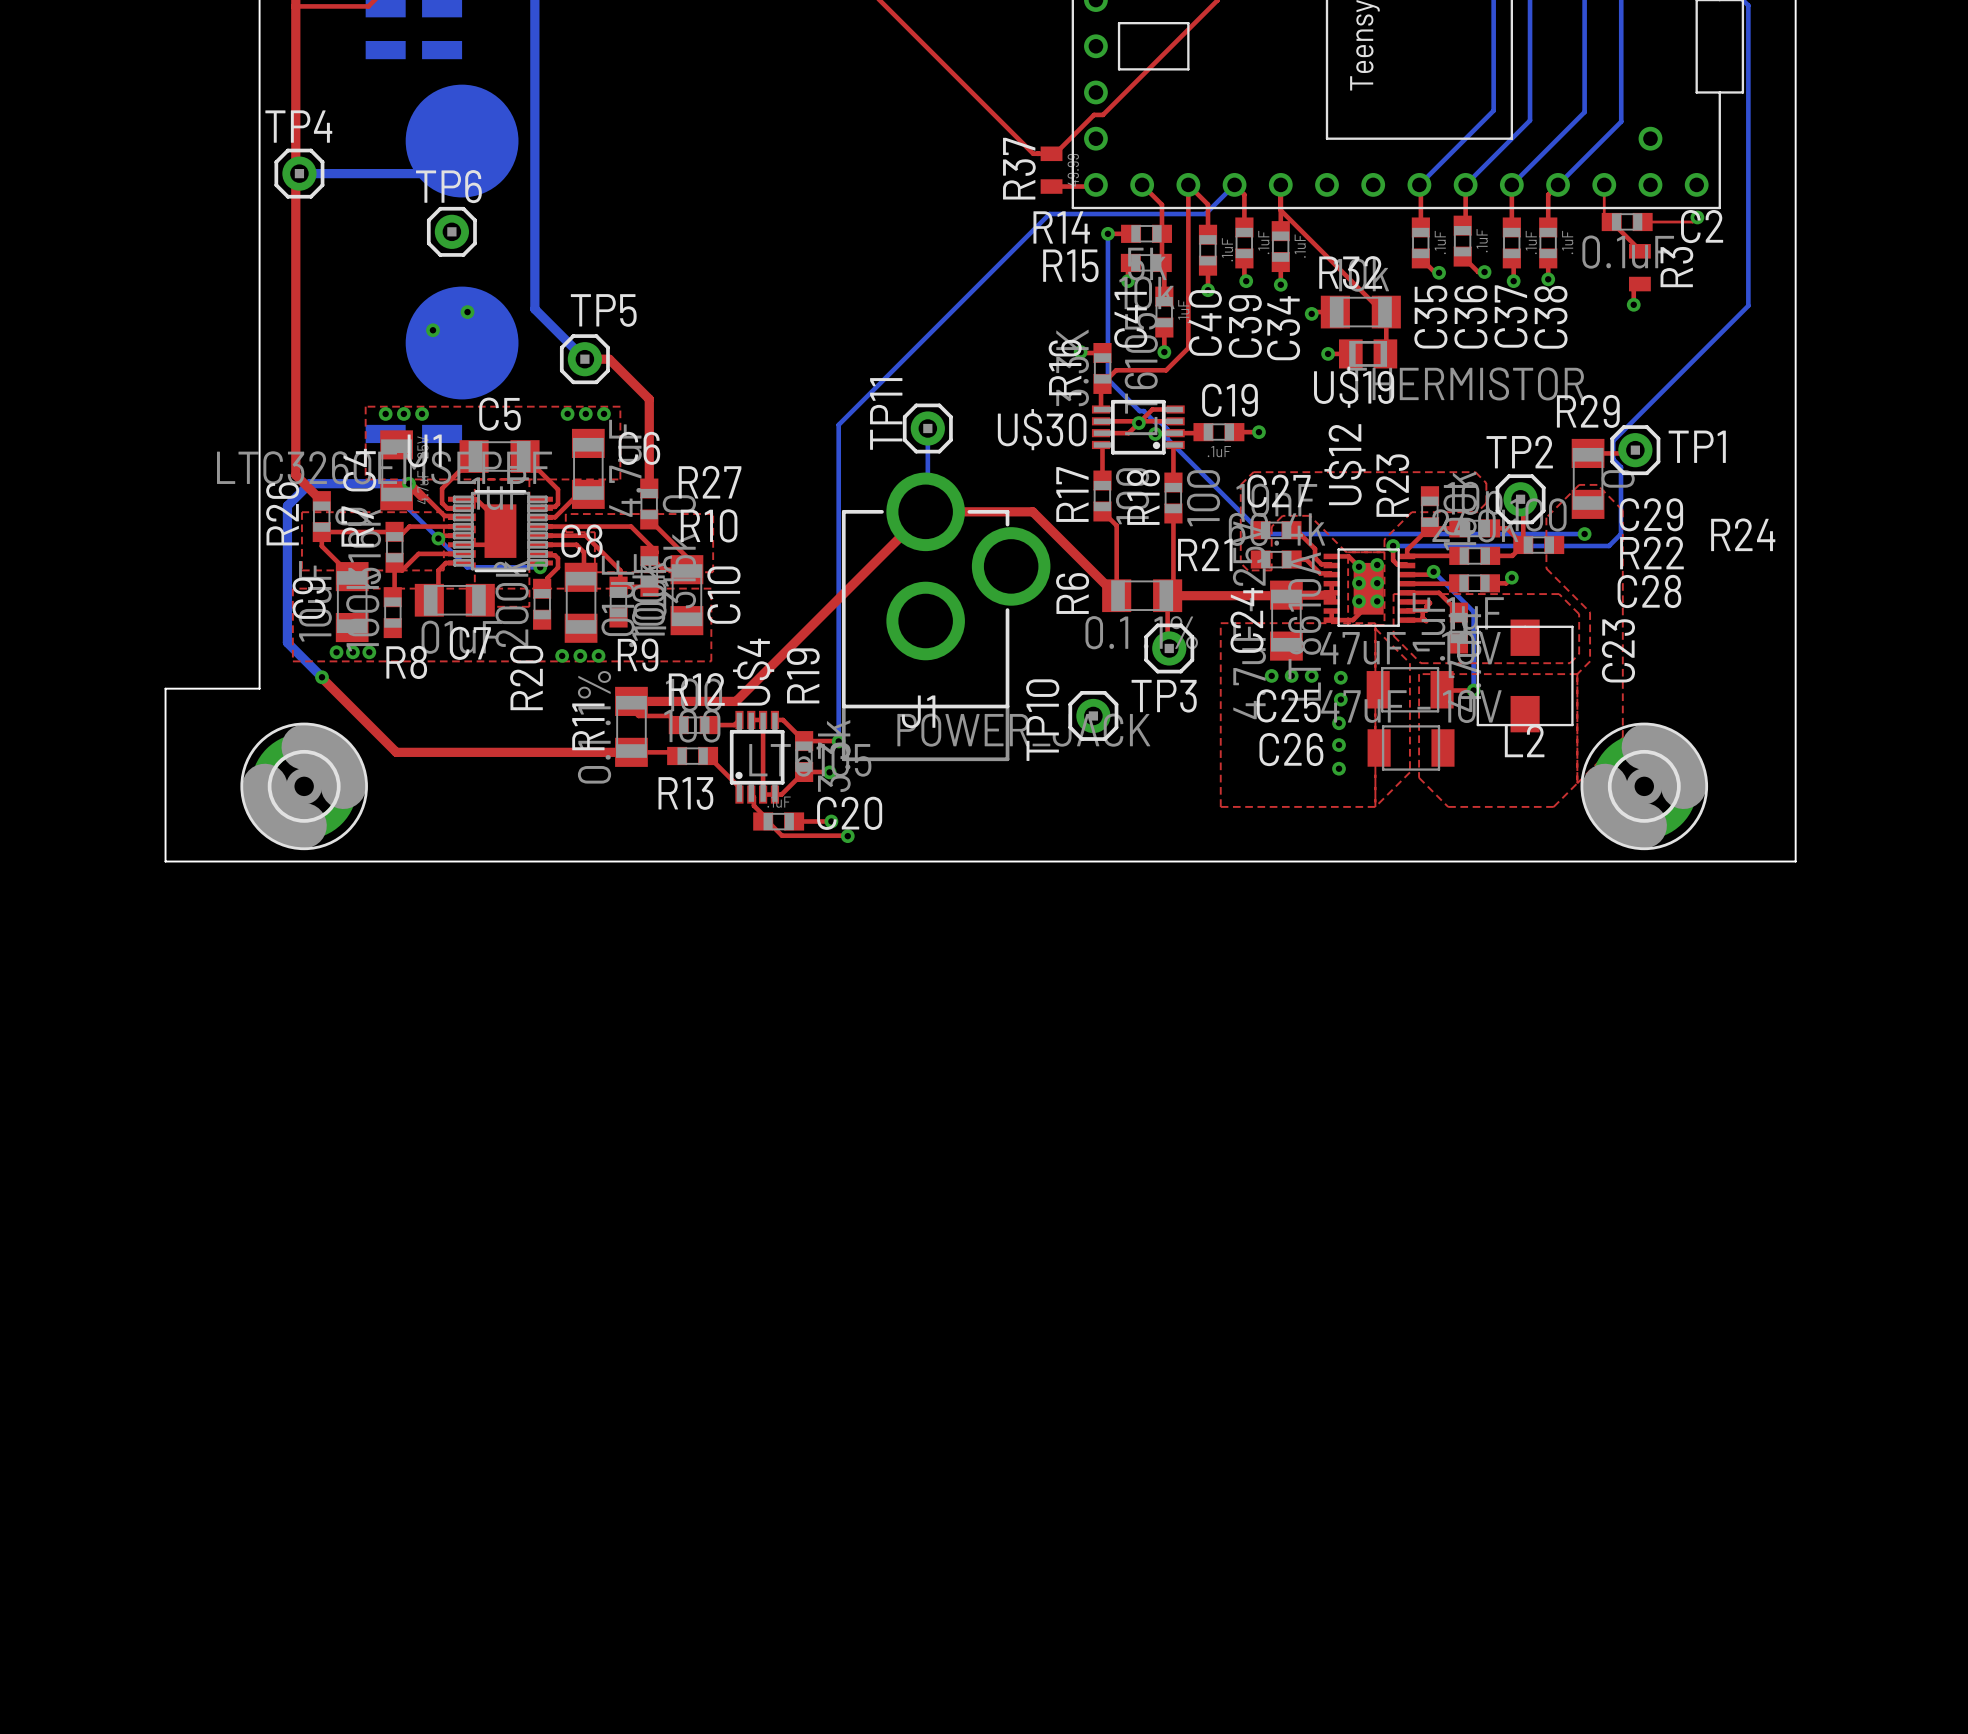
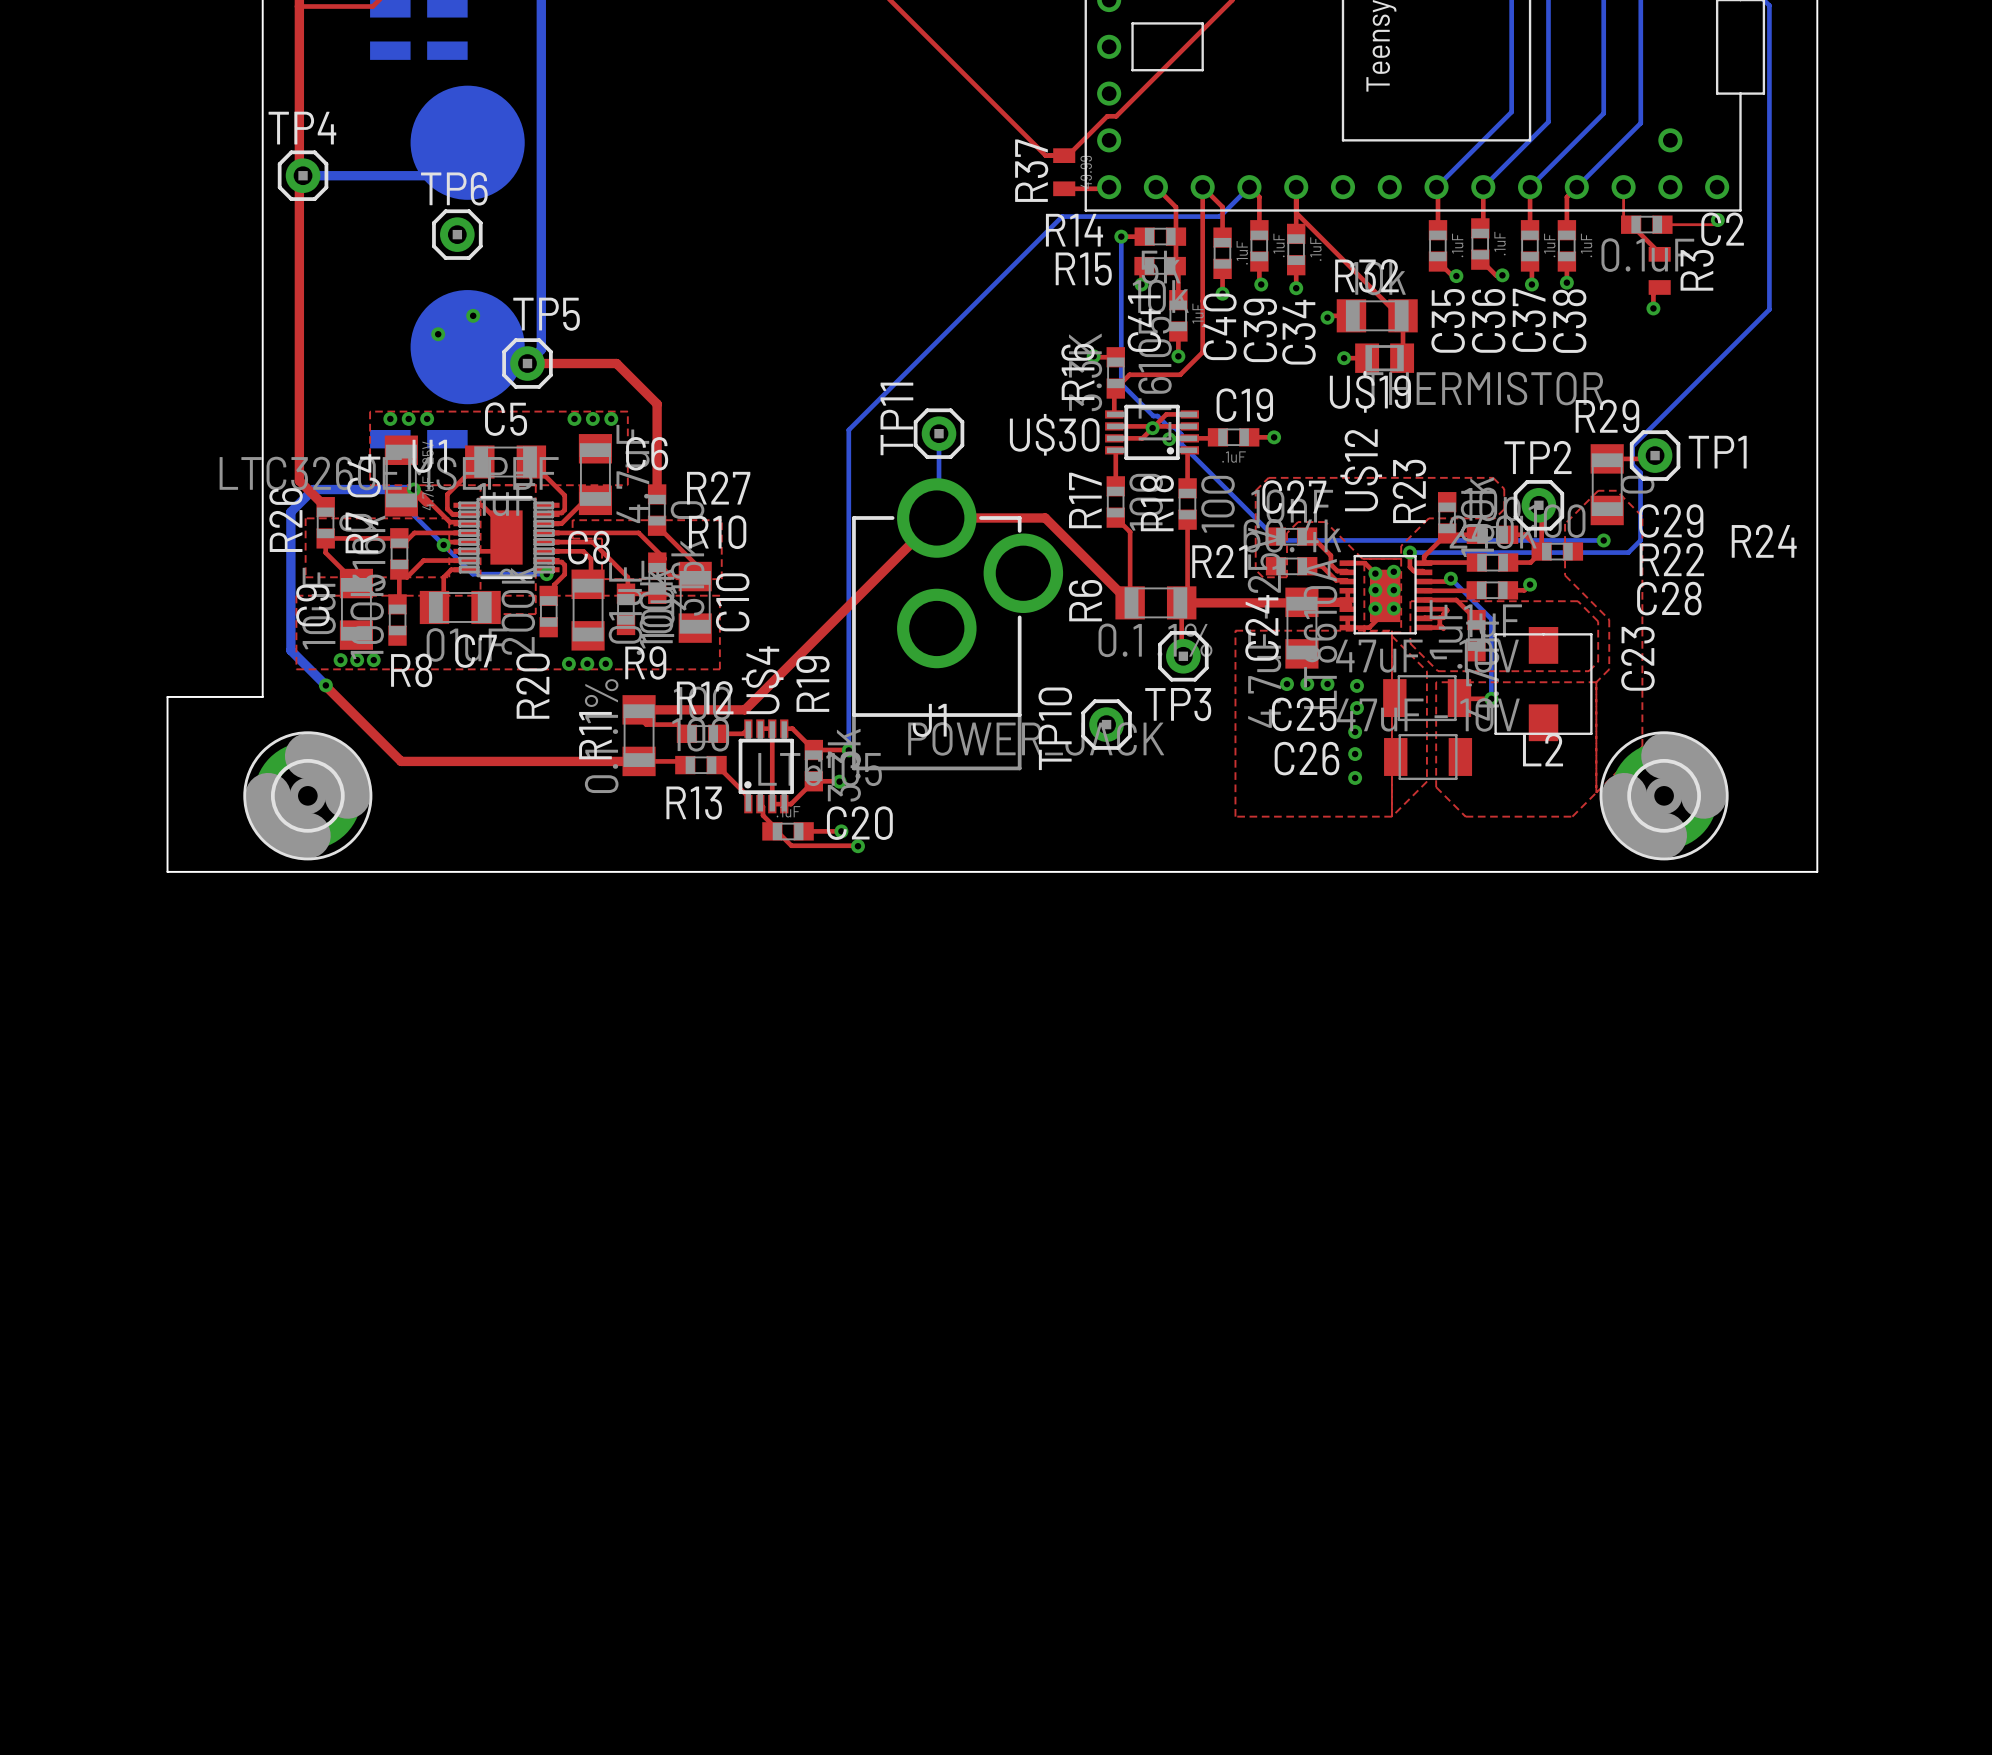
bottom track: (534, 309) (584, 359) -> (541, 312) (541, 349) (527, 363)
top track: none -> (527, 363) (591, 363)
TP5 position: (584, 359) -> (527, 363)

